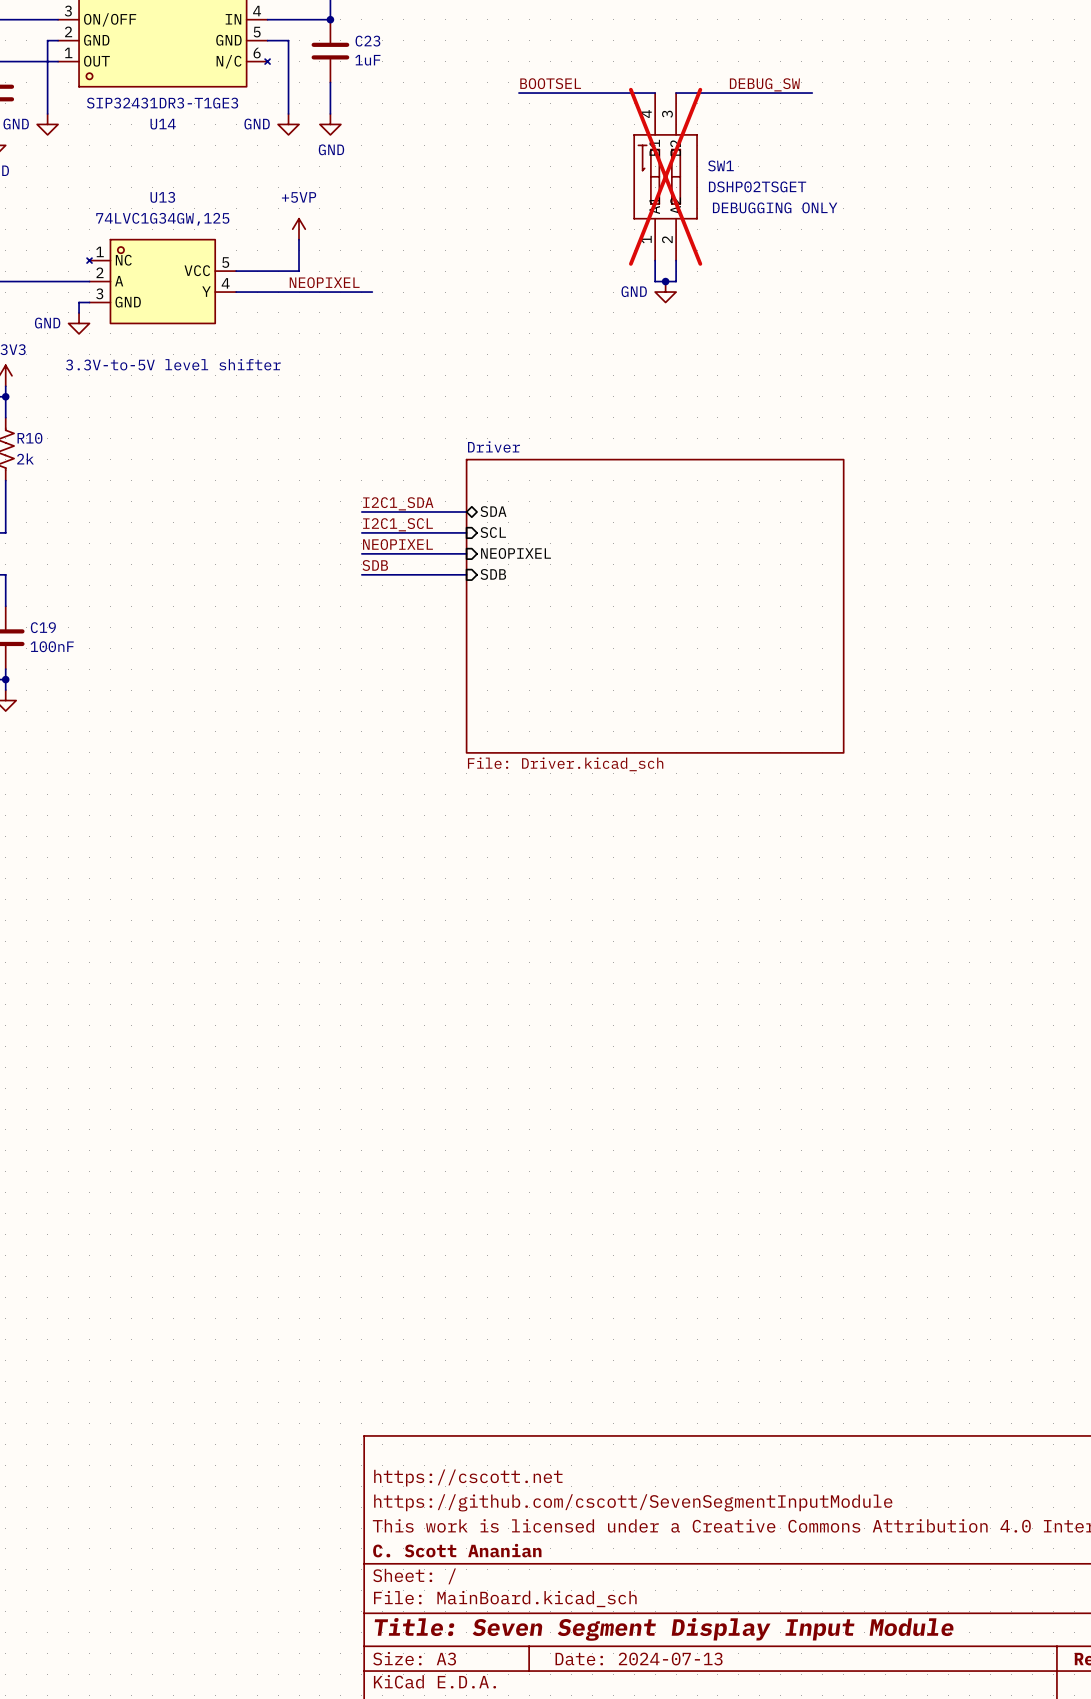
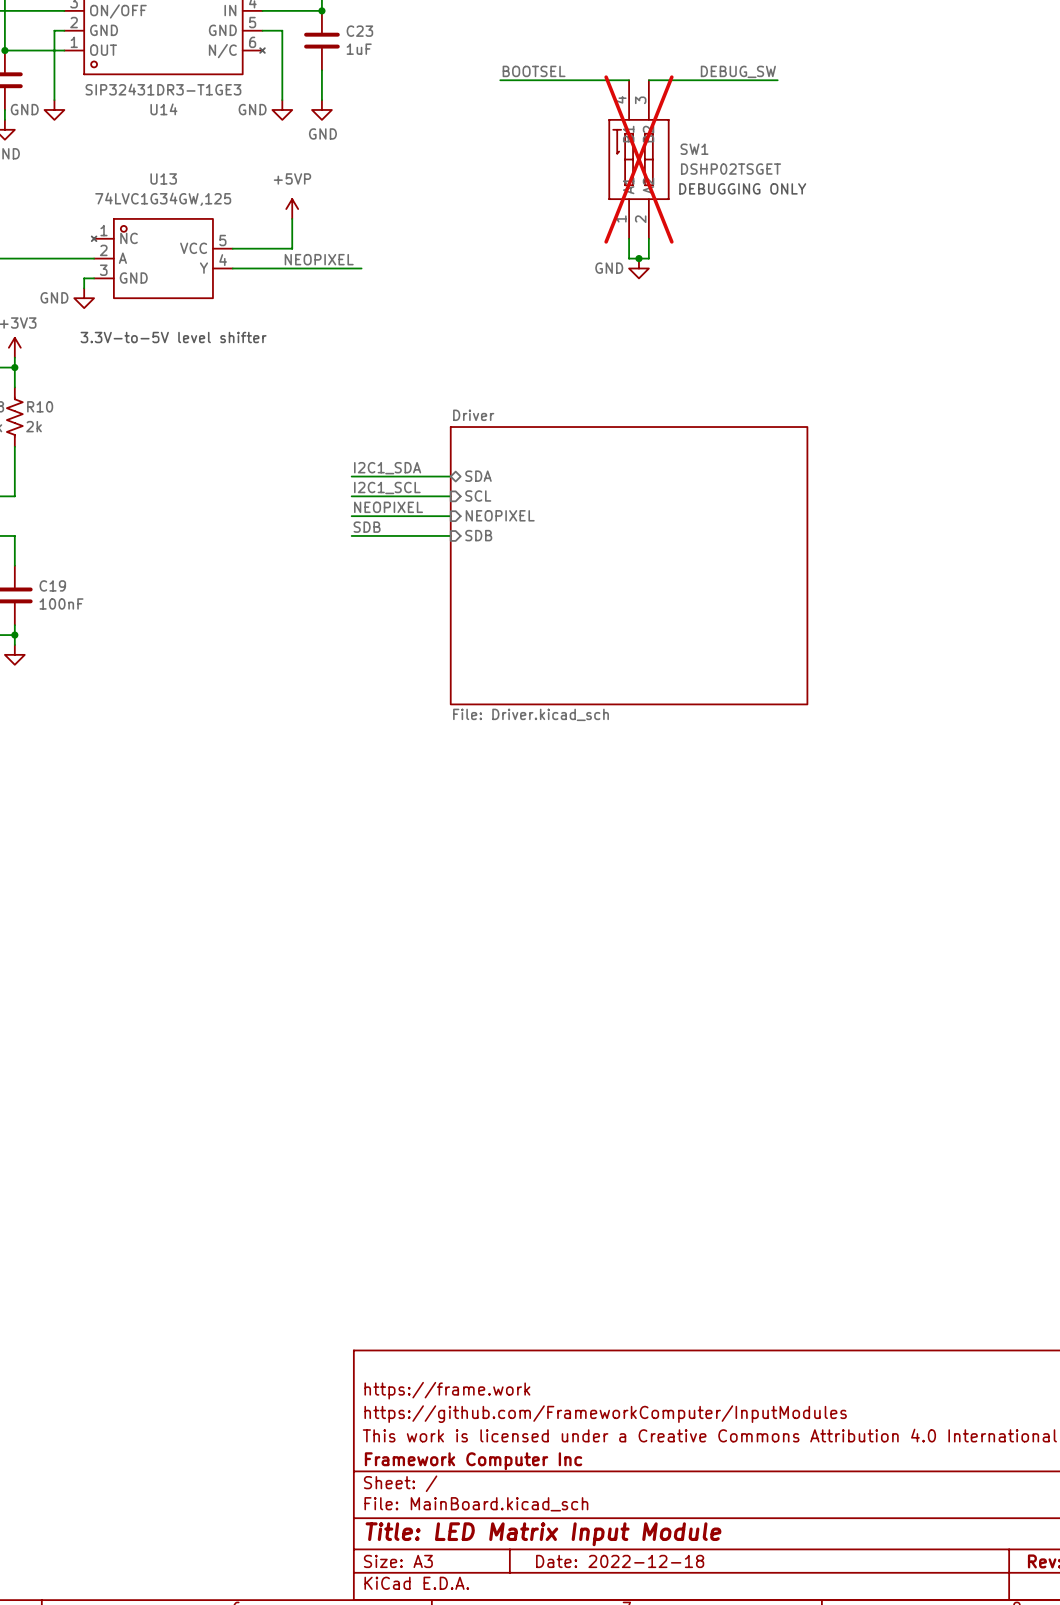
title block: https://cscott.net (468, 1477) -> https://frame.work (447, 1390)
title block: https://github.com/cscott/SevenSegmentInputModule (633, 1502) -> https://github.com/FrameworkComputer/InputModules (605, 1414)
title block: C. Scott Ananian (457, 1550) -> Framework Computer Inc (473, 1461)
title block: Title: Seven Segment Display Input Module (664, 1629) -> Title: LED Matrix Input Module (543, 1534)
title block: Date: 2024-07-13 (639, 1659) -> Date: 2022-12-18 (620, 1561)

